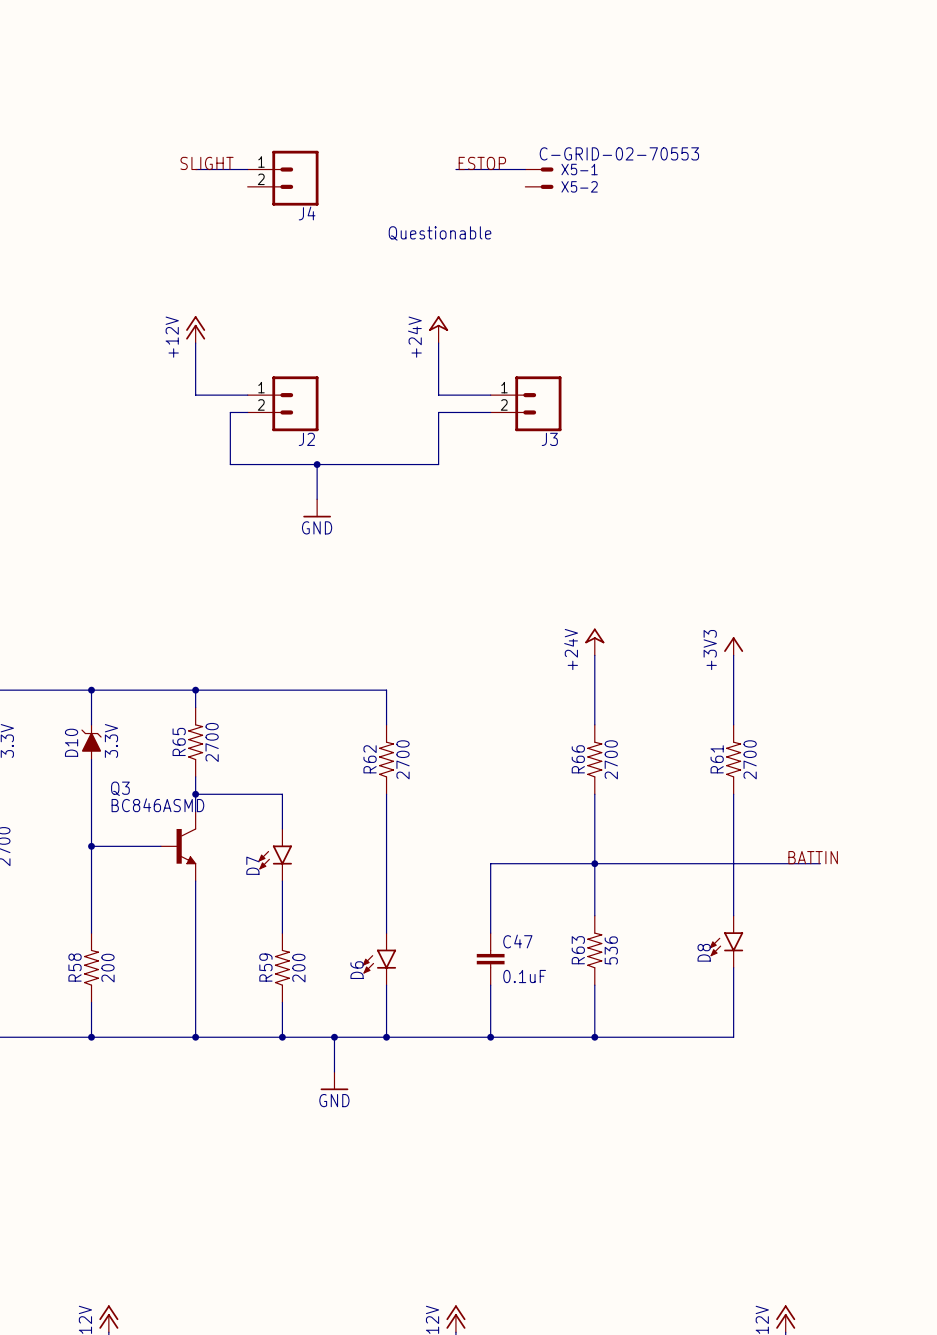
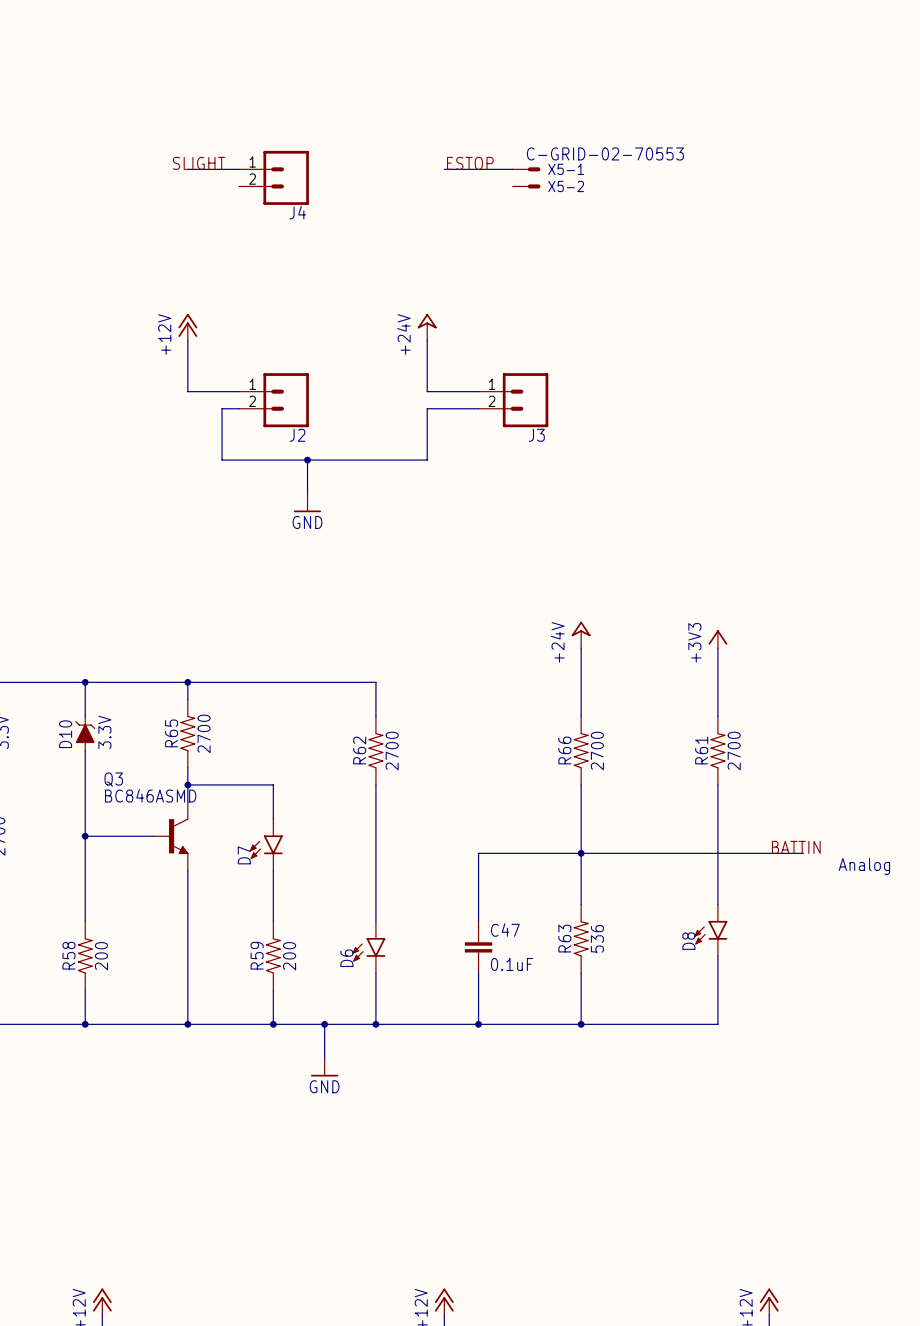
text: Questionable (440, 233) -> none
text: none -> Analog (864, 866)

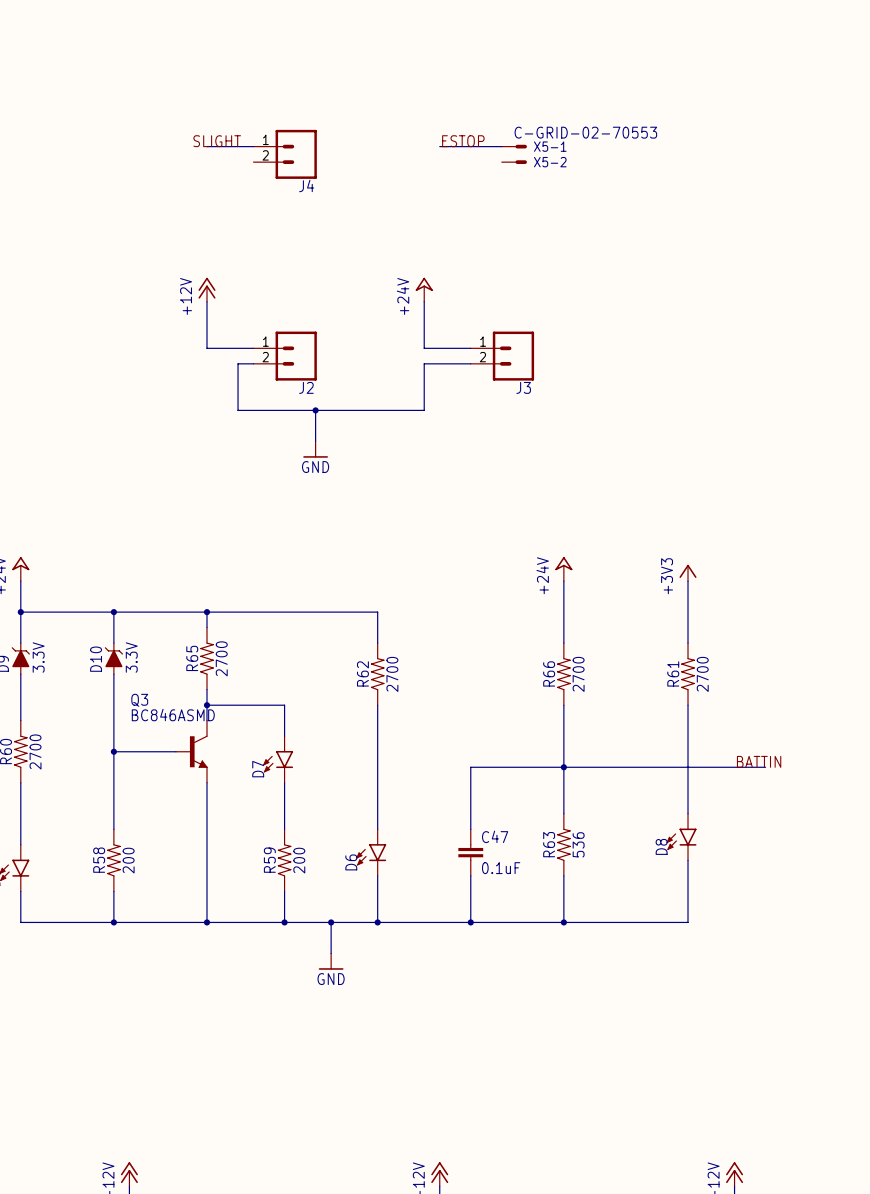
text: Analog (864, 866) -> none

